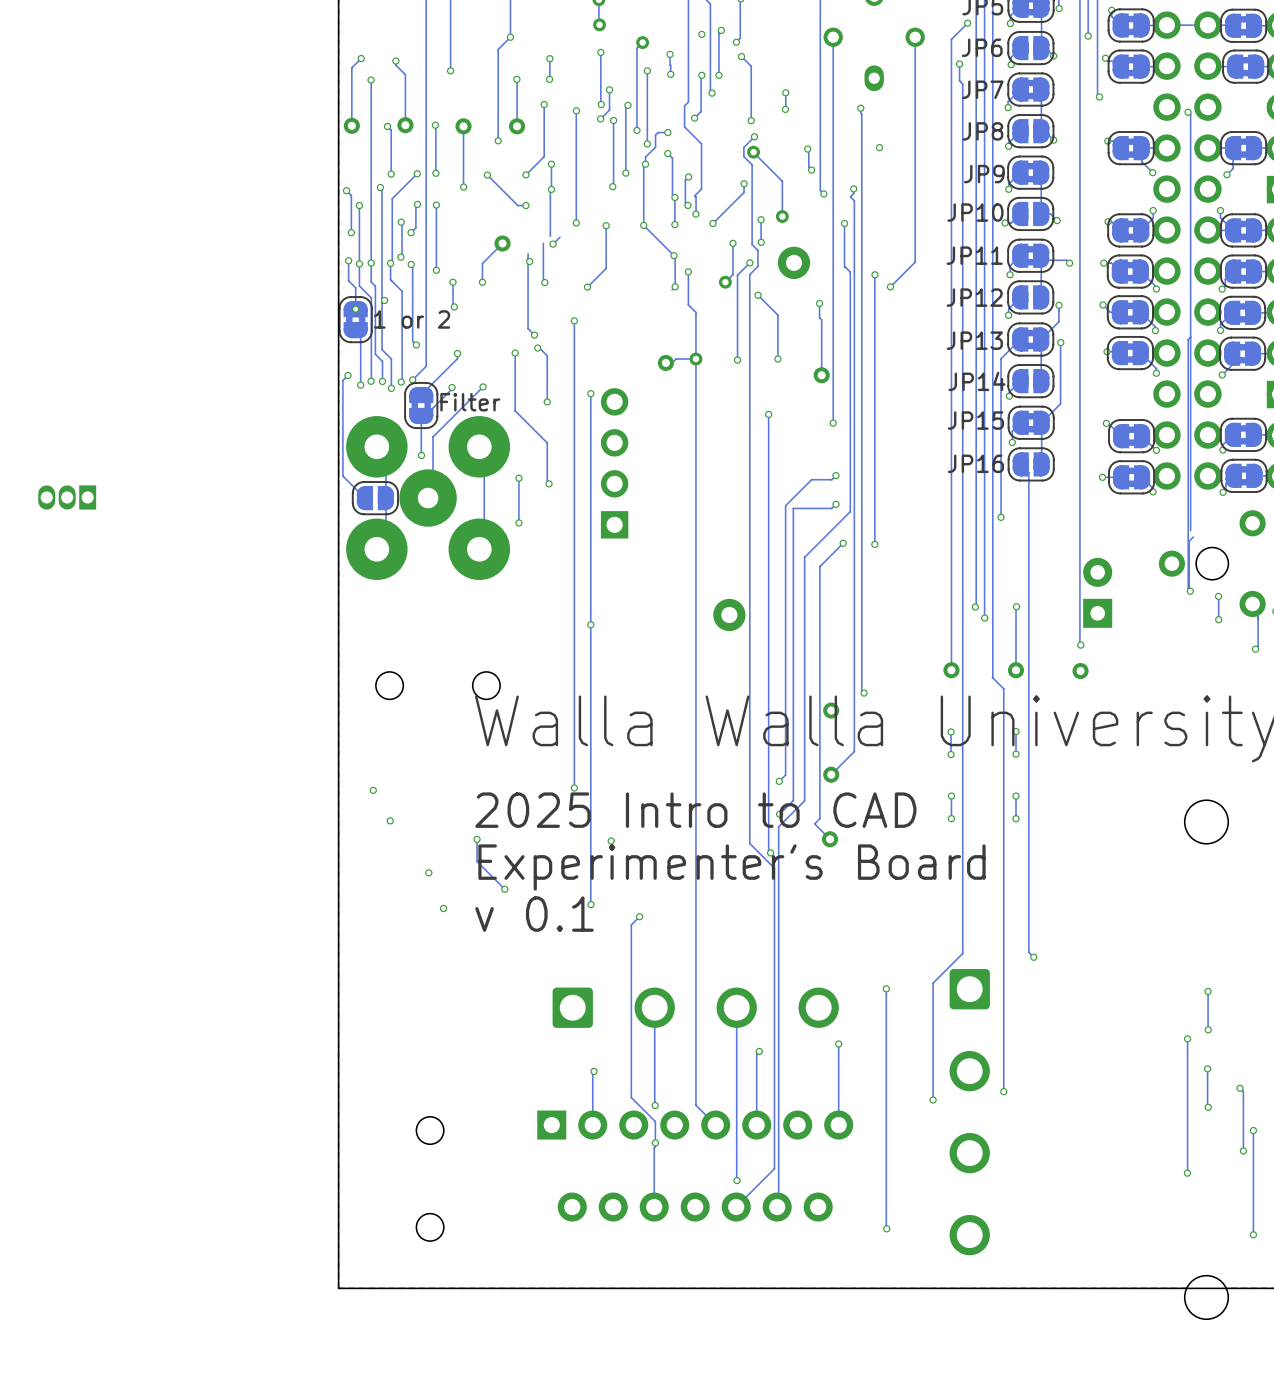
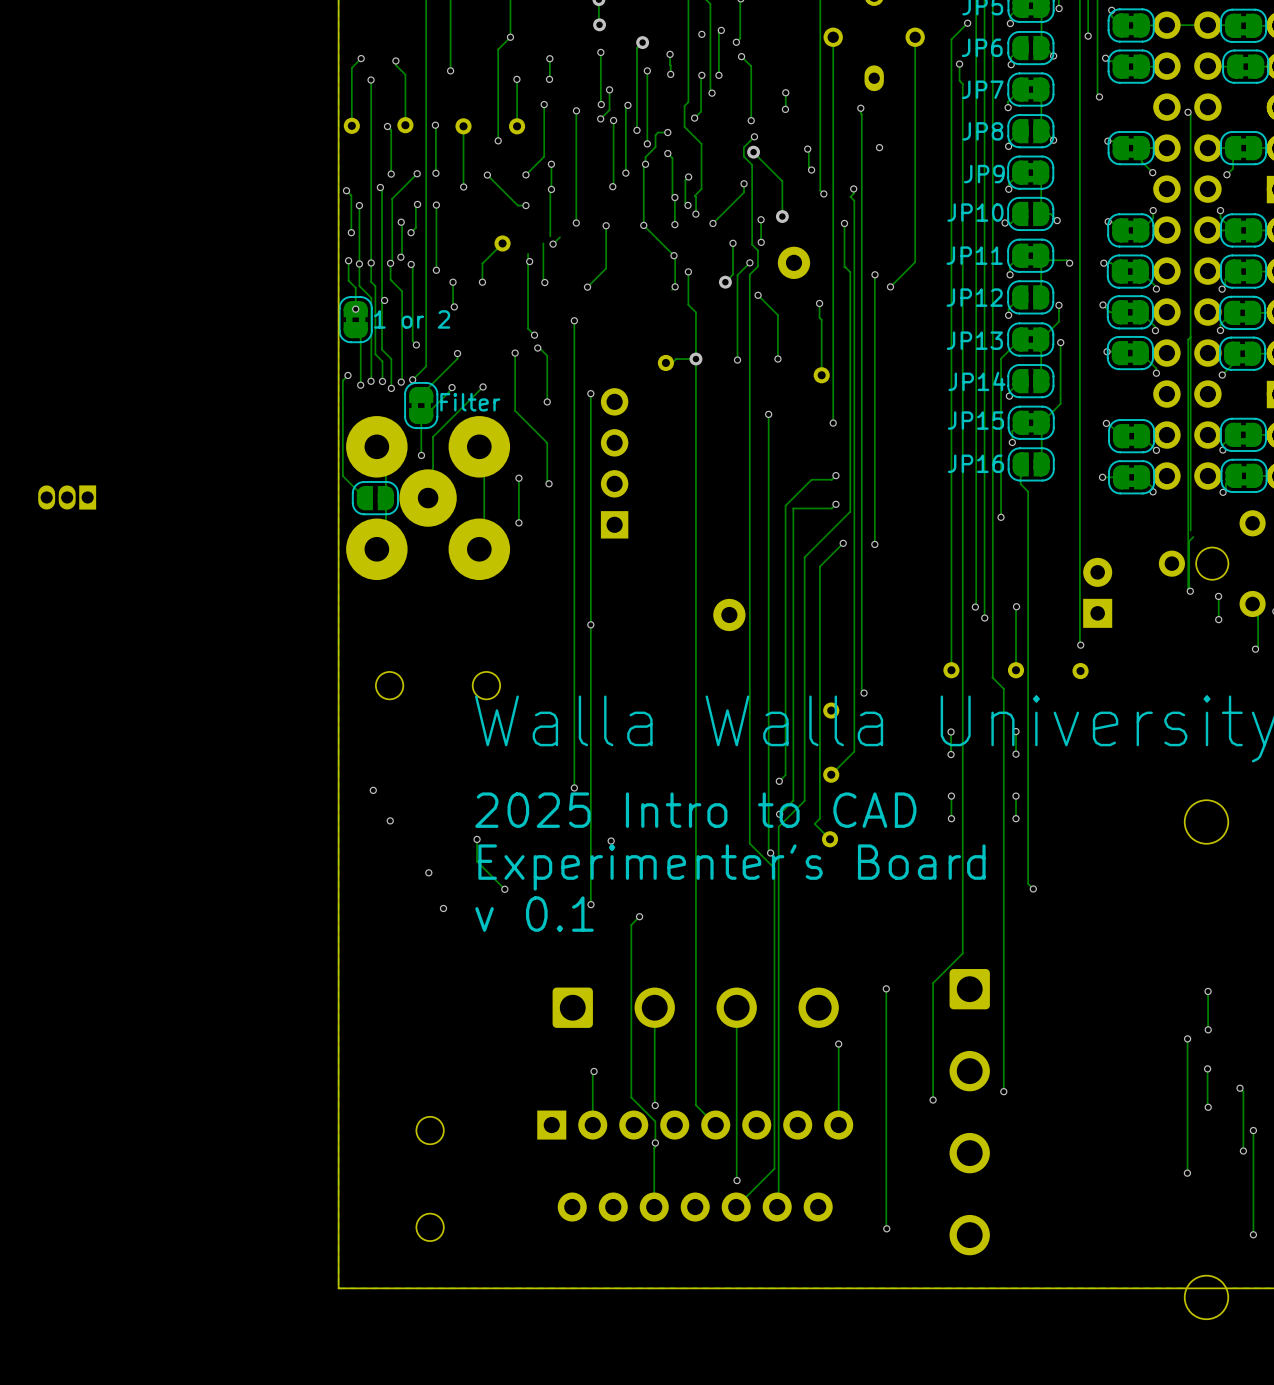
track: (1020, 464) (1028, 472) (1028, 952) (1033, 957) -> (1020, 464) (1020, 484) (1028, 491) (1028, 883) (1033, 888)
via position: (1033, 957) -> (1033, 888)
track: (759, 1051) (756, 1054) (756, 1125) -> none
via: (759, 1051) -> none

